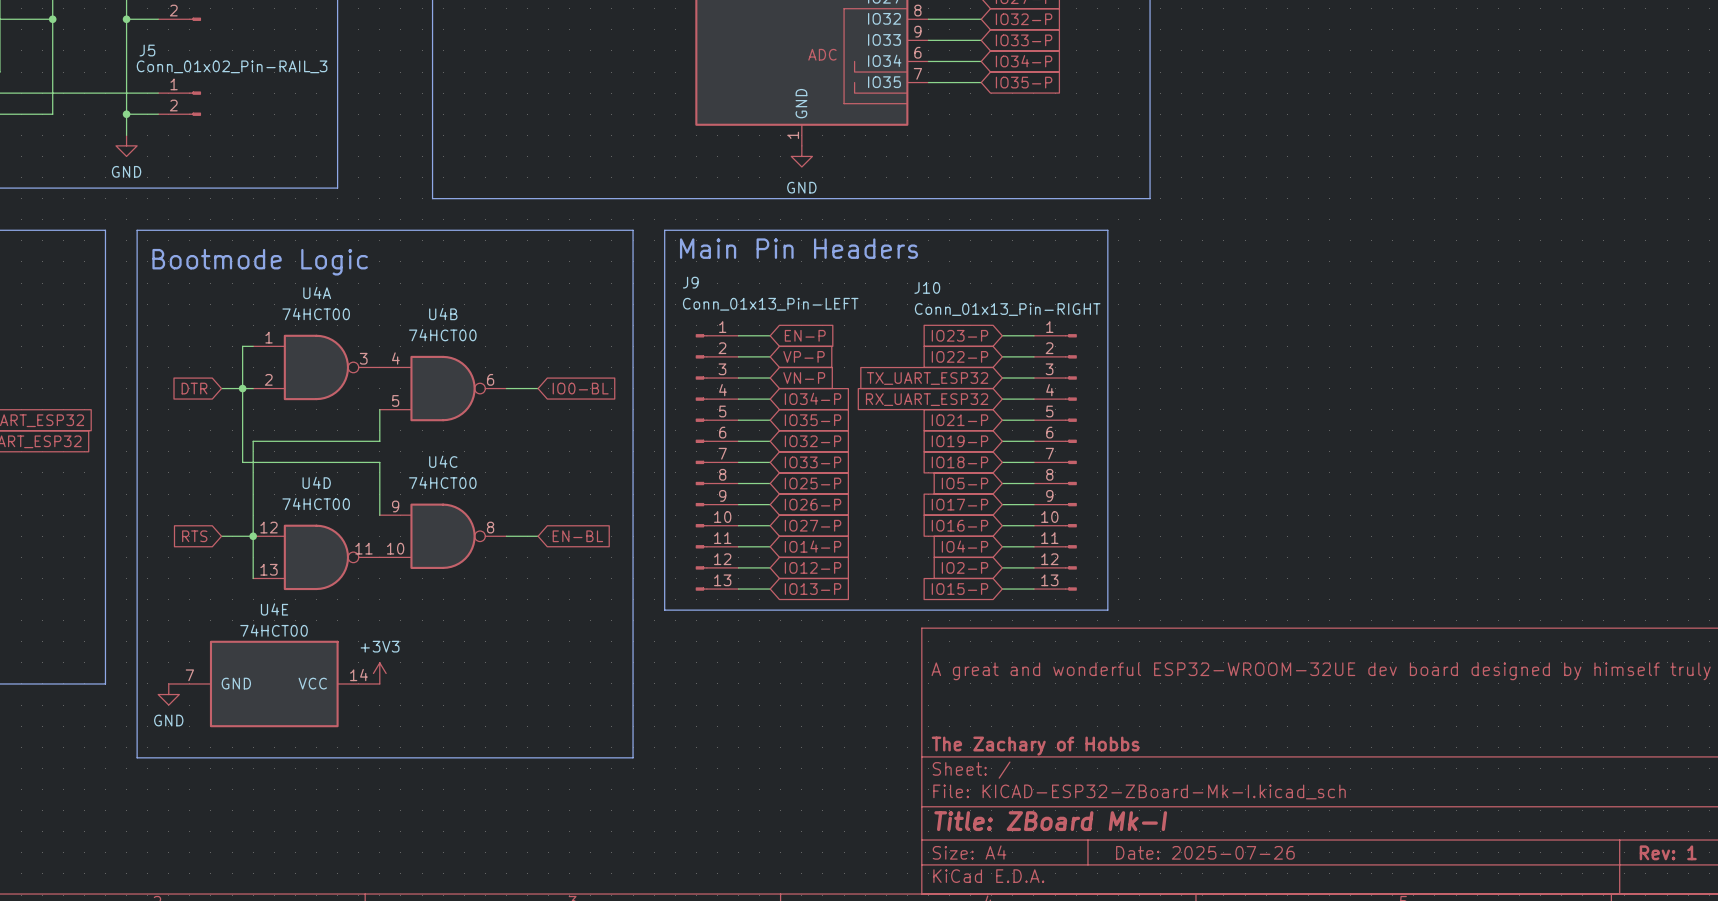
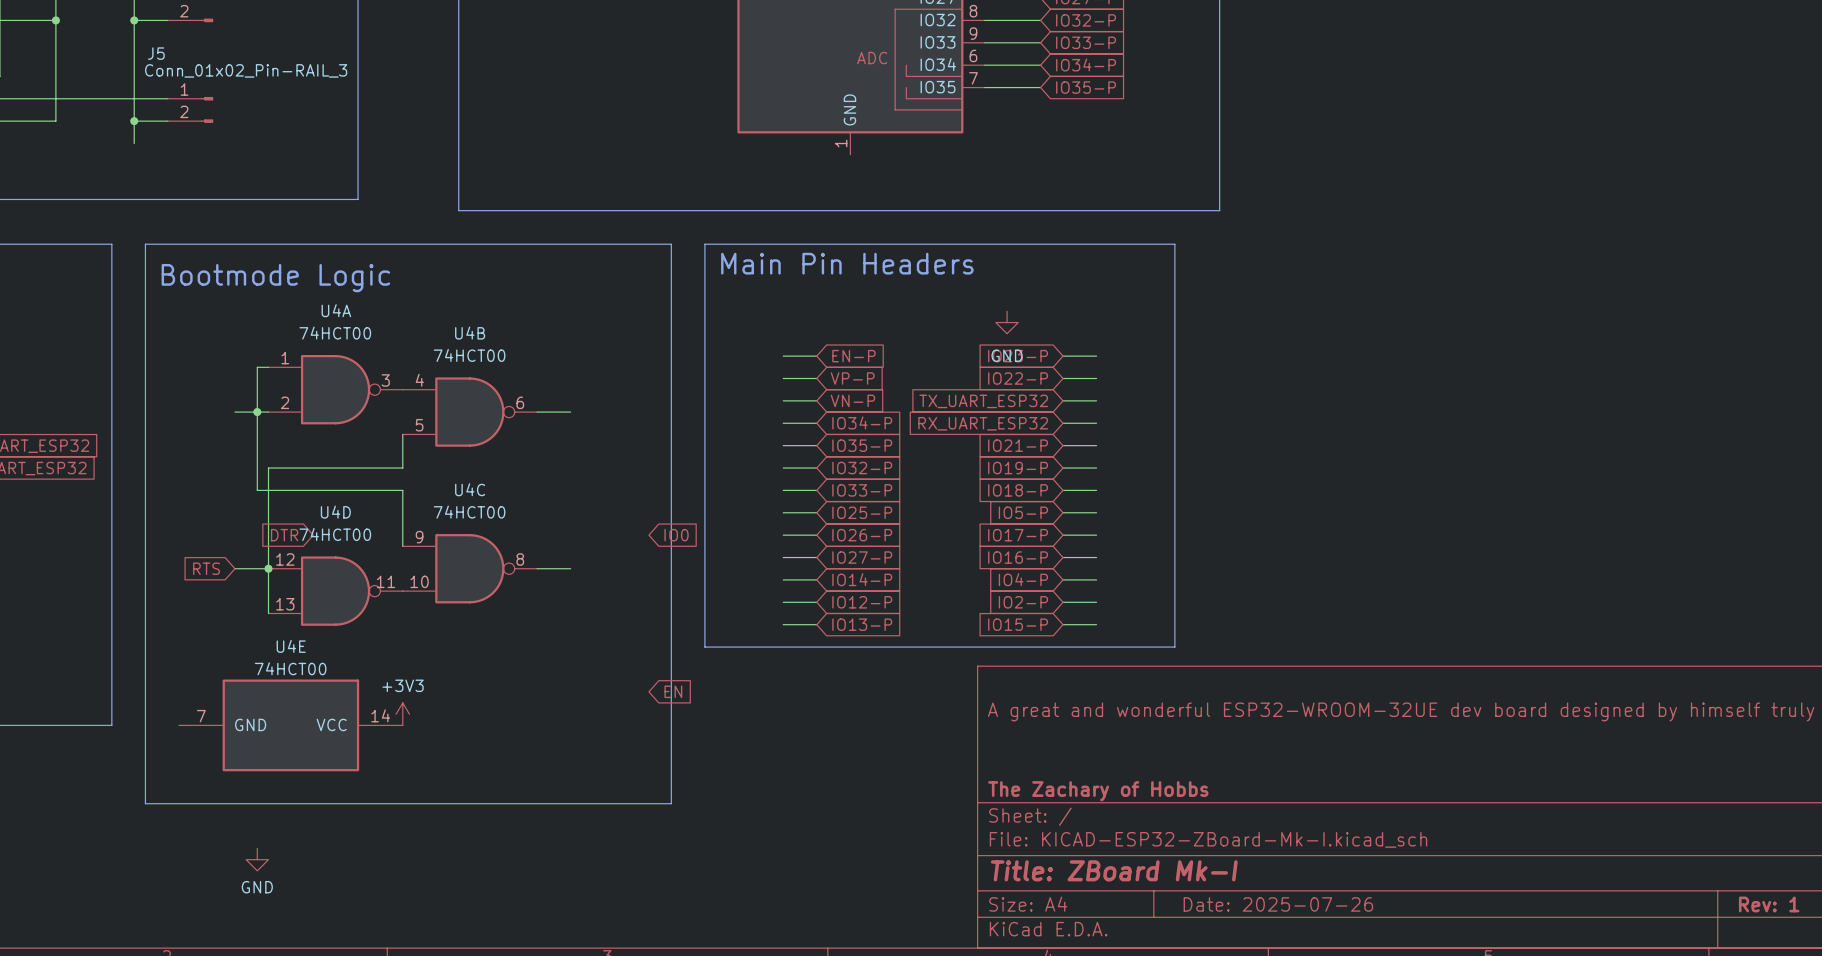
power symbol: GND (126, 145) -> none
power symbol: GND (801, 156) -> none
power symbol: none -> GND (1007, 322)
global label position: DTR (194, 388) -> DTR (284, 535)
global label: IO0-BL (580, 388) -> none
J9: Conn_01x13_Pin-LEFT (717, 462) -> none
J10: Conn_01x13_Pin-RIGHT (1055, 462) -> none
global label: none -> IO0 (676, 535)
global label: EN-BL (577, 536) -> none
global label: none -> EN (673, 691)
power symbol position: GND (168, 694) -> GND (257, 859)

